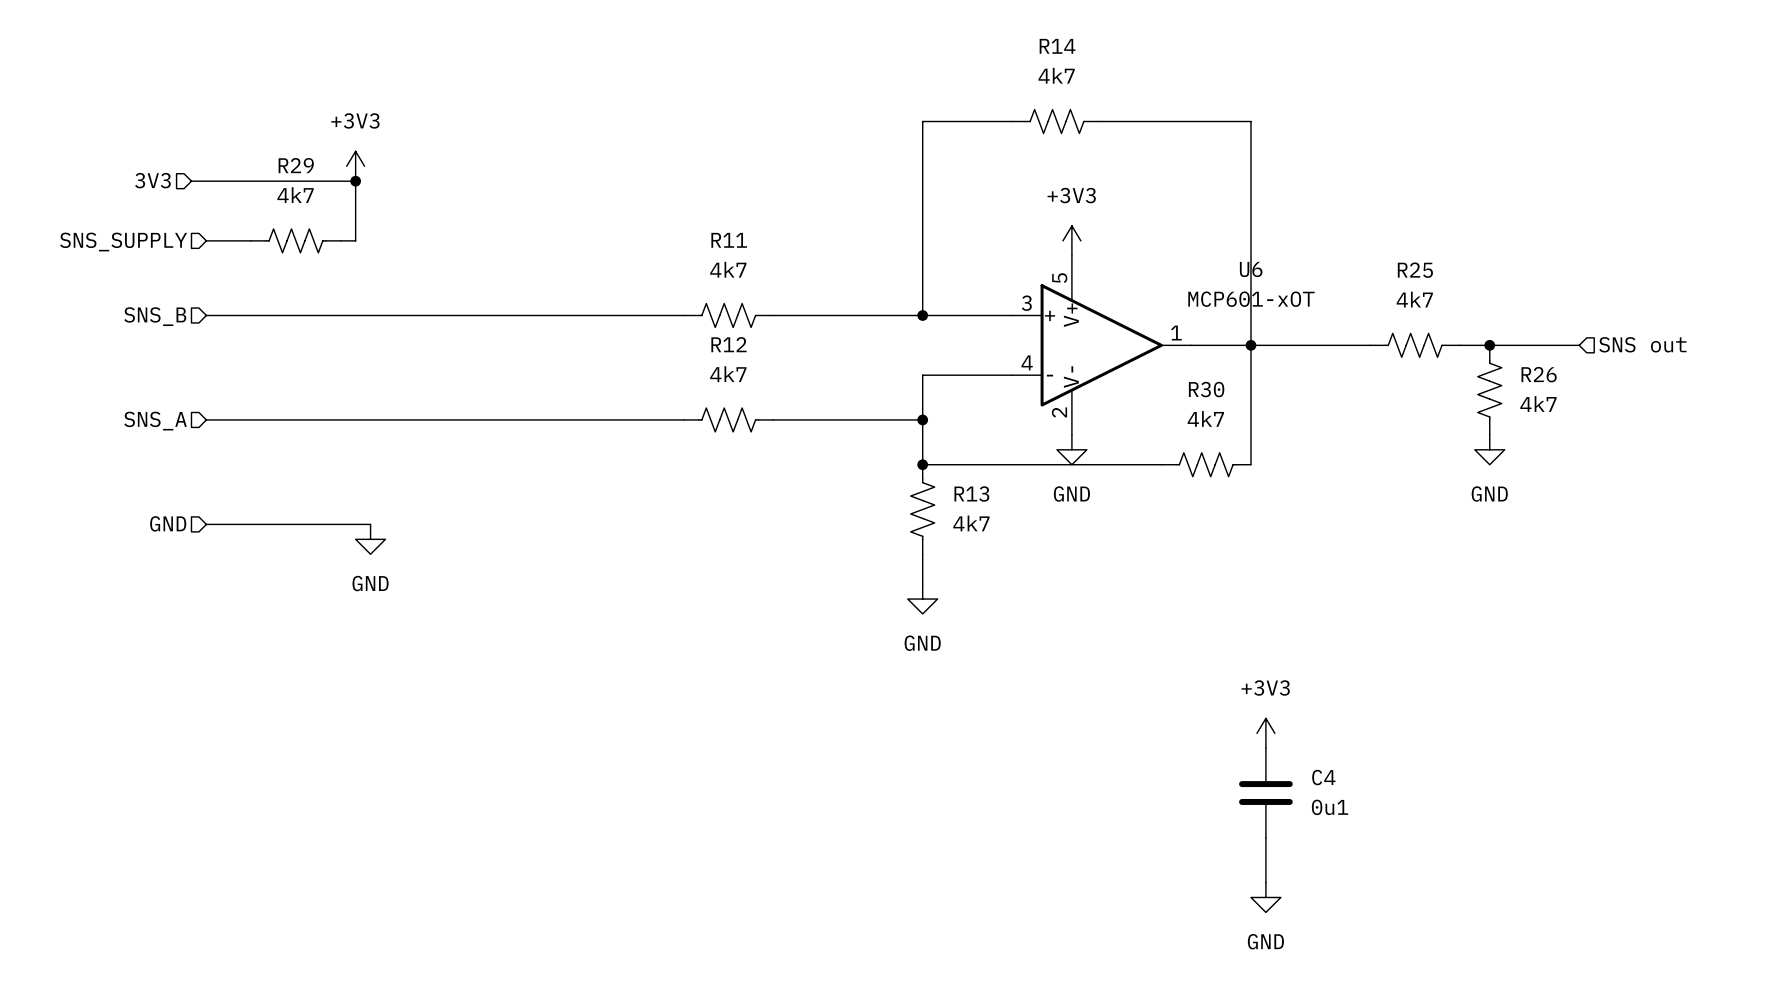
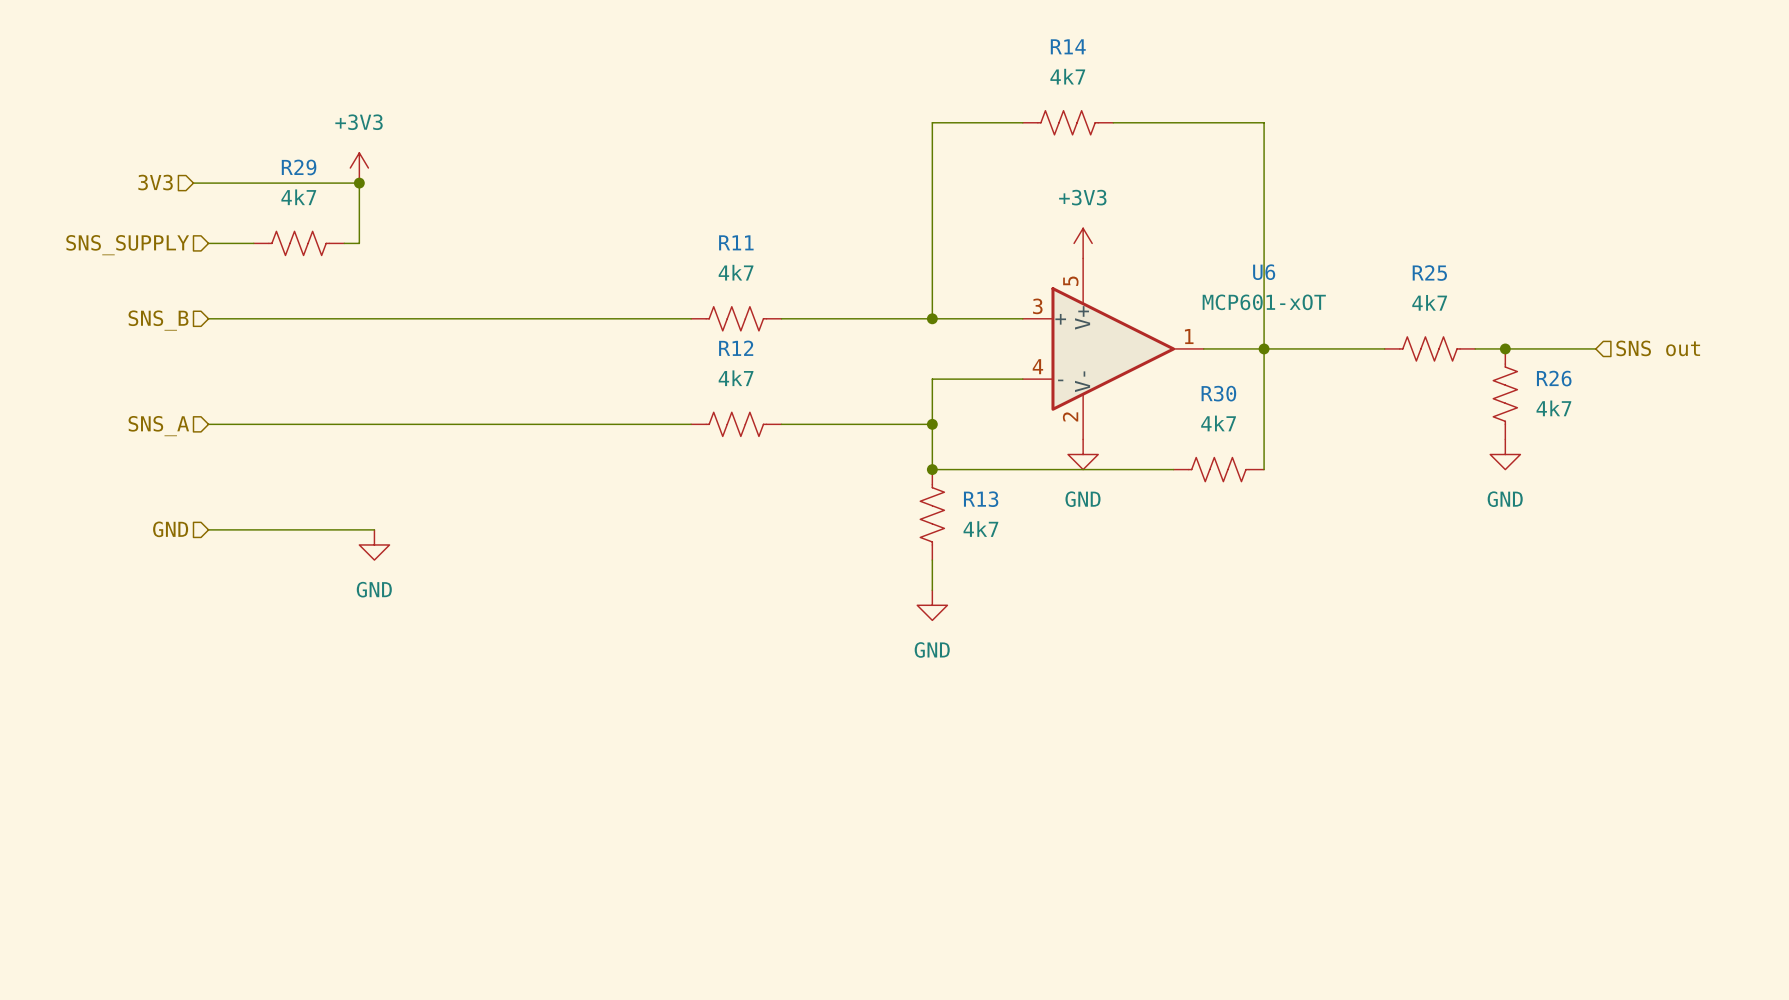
power symbol: +3V3 (1265, 733) -> none
C4: 0u1 (1265, 793) -> none
wire: (1265, 837) (1265, 882) -> none
power symbol: GND (1265, 897) -> none

